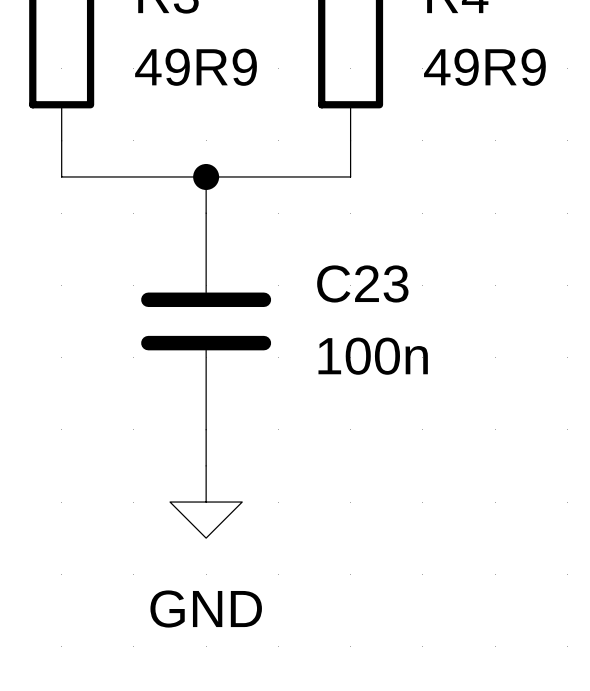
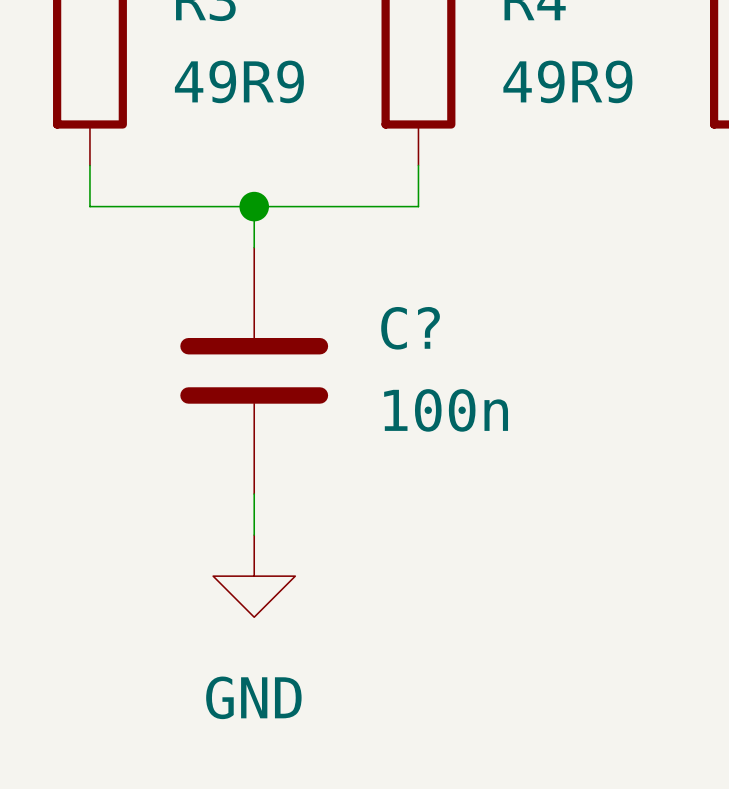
C23 name: C23 (362, 283) -> C? (410, 328)

